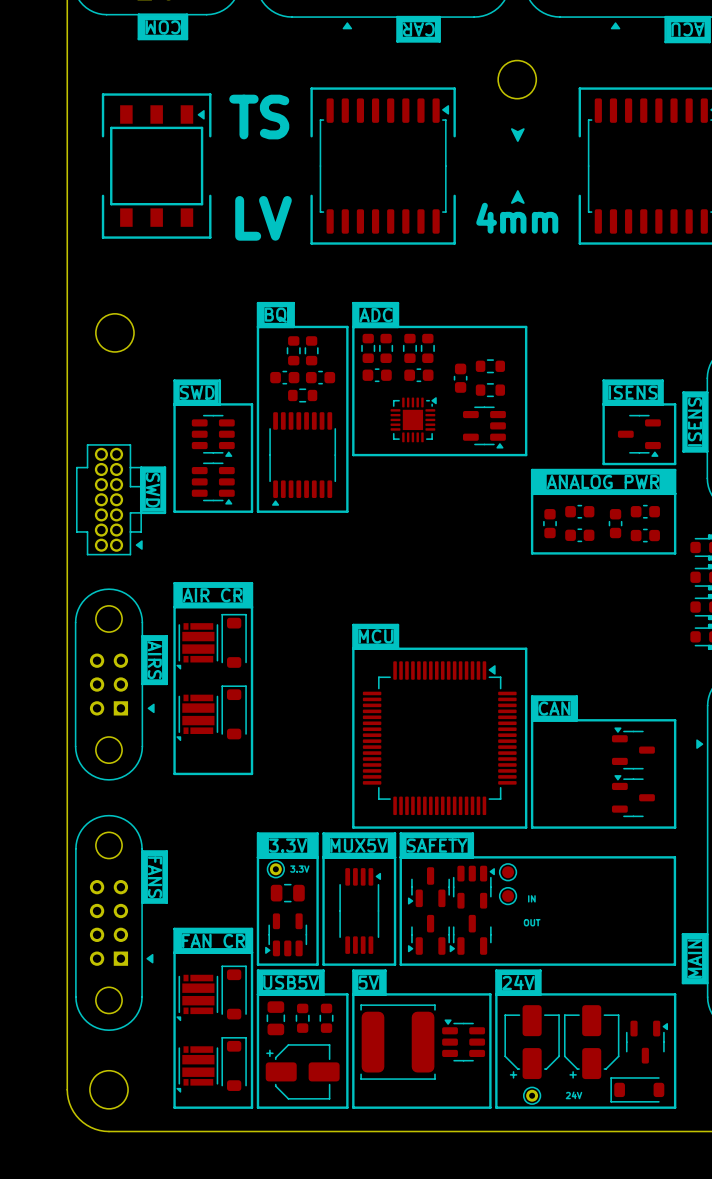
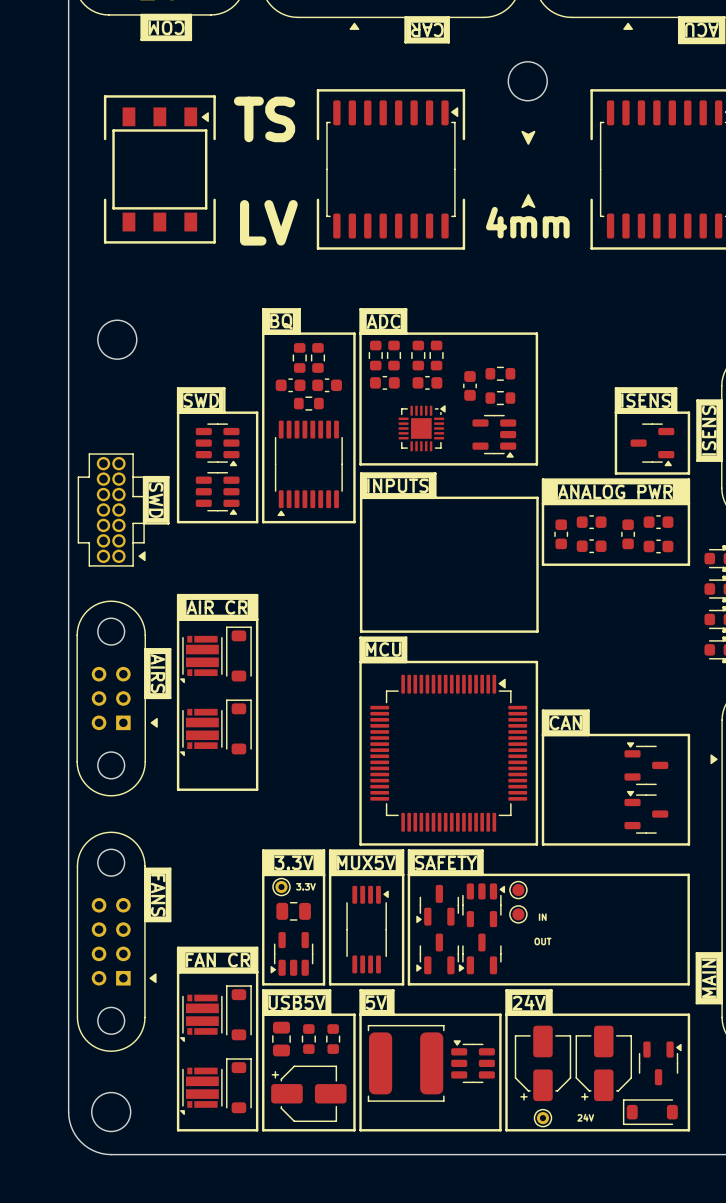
drawing: none -> [361, 473, 436, 498]
text: none -> INPUTS (397, 485)
line: none -> (361, 497) (537, 497) (537, 631) (361, 631) (361, 473) (435, 473) (435, 497)

